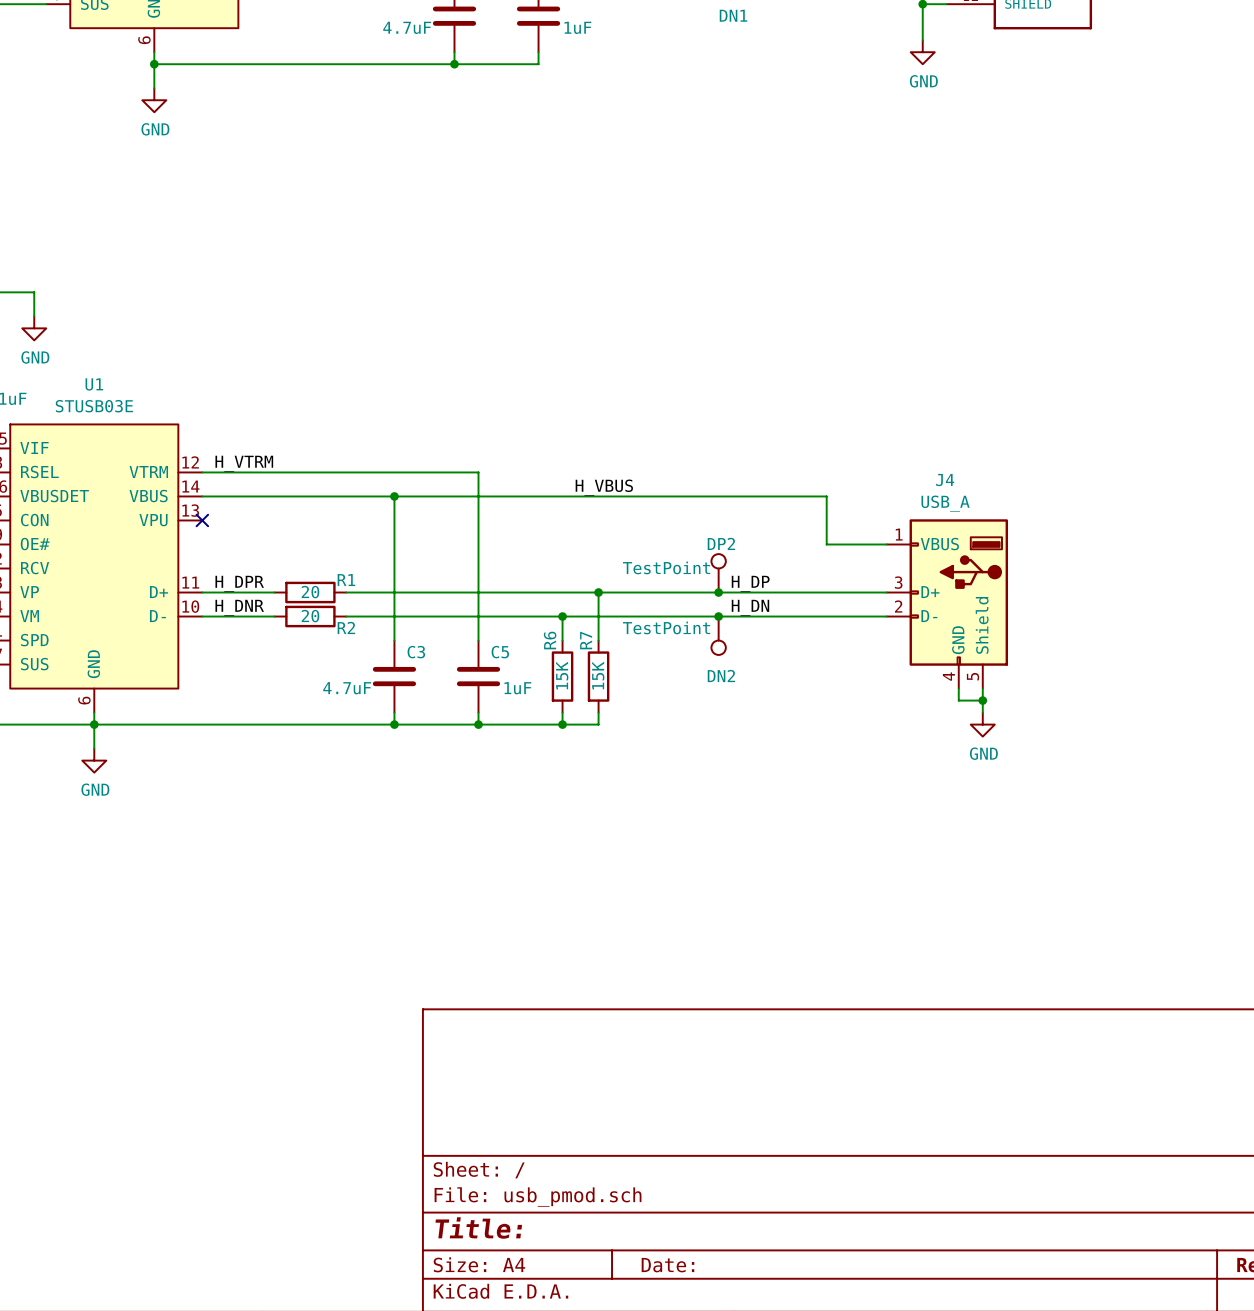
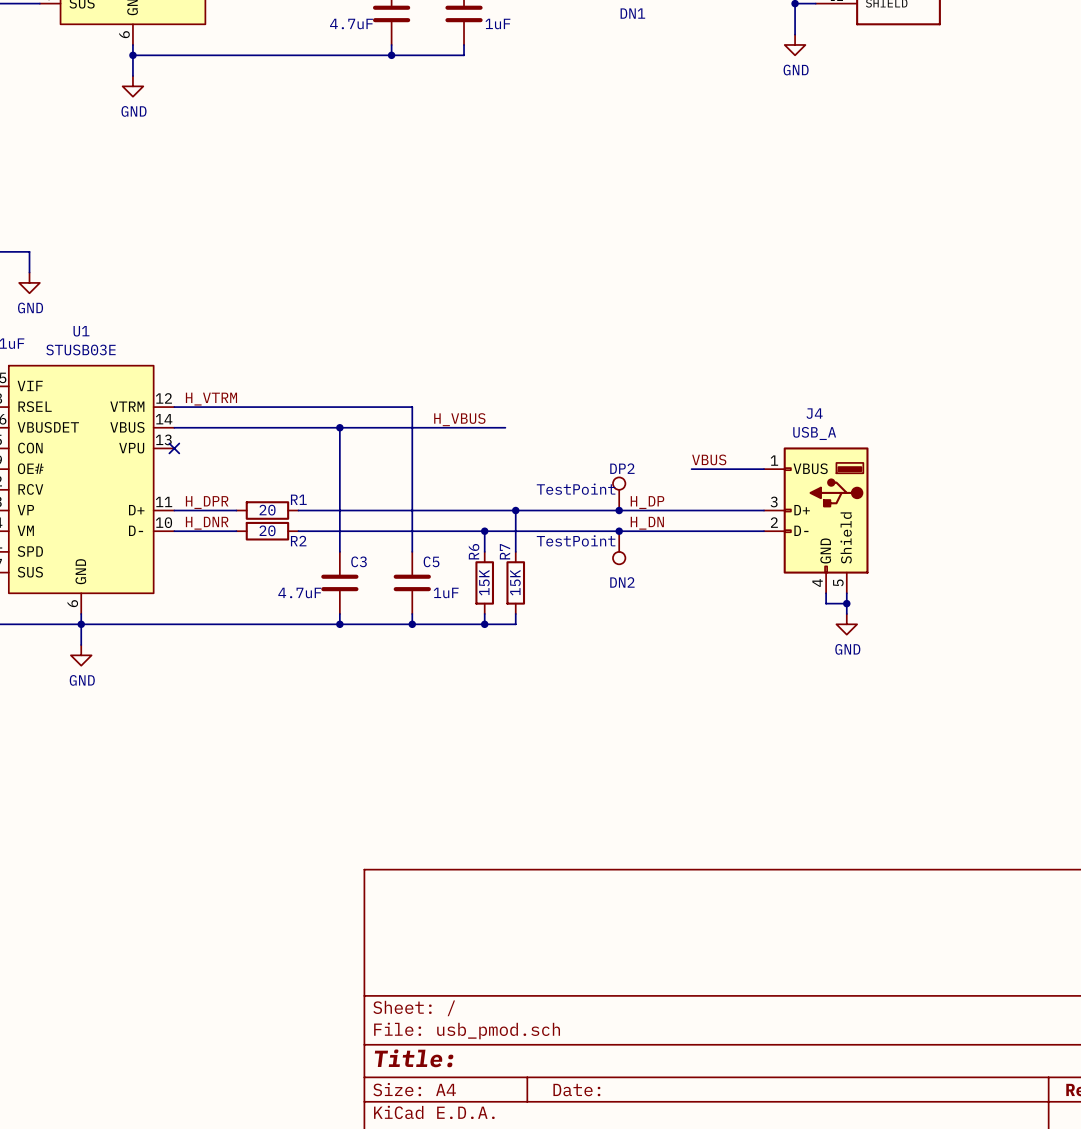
label position: H_VBUS (604, 487) -> H_VBUS (459, 419)
wire: (586, 496) (826, 496) (826, 544) -> (691, 469) (712, 469)
label: none -> VBUS (709, 459)

